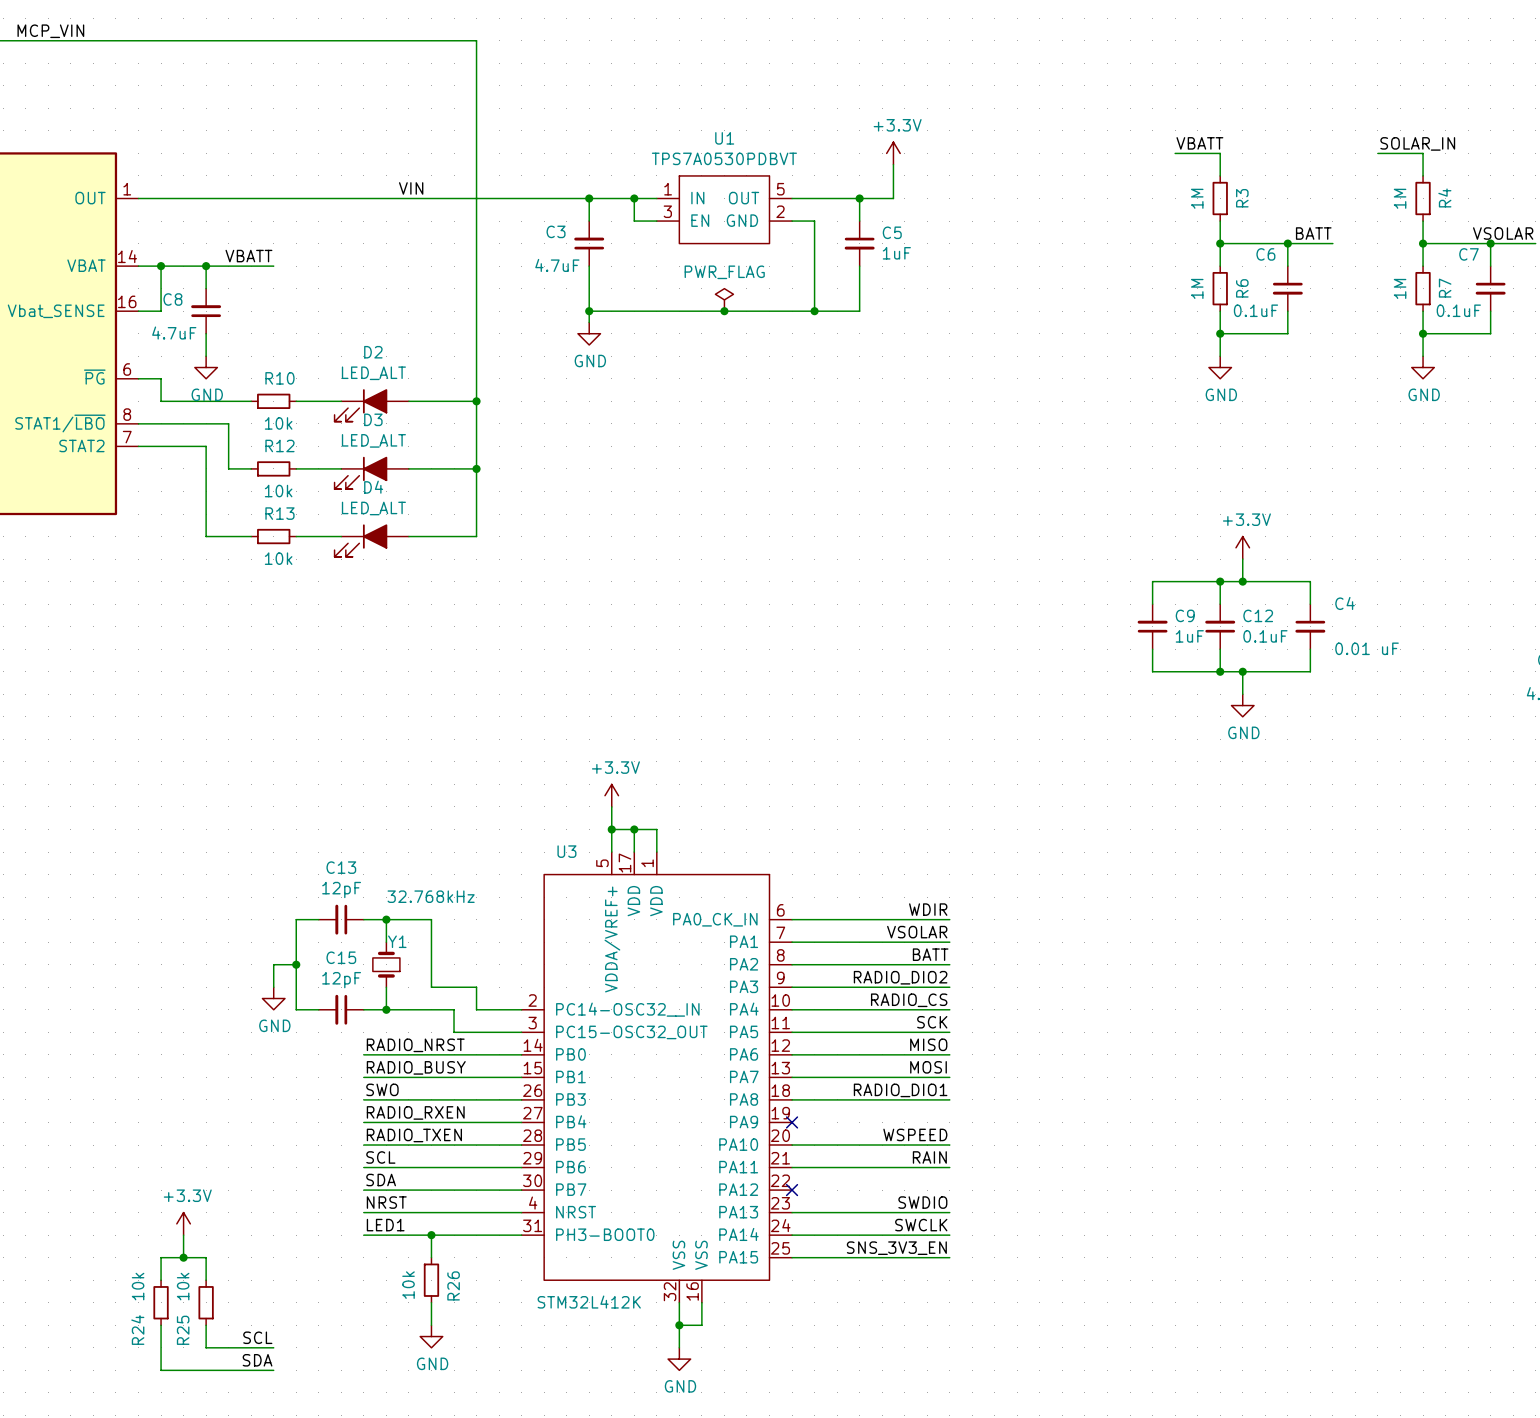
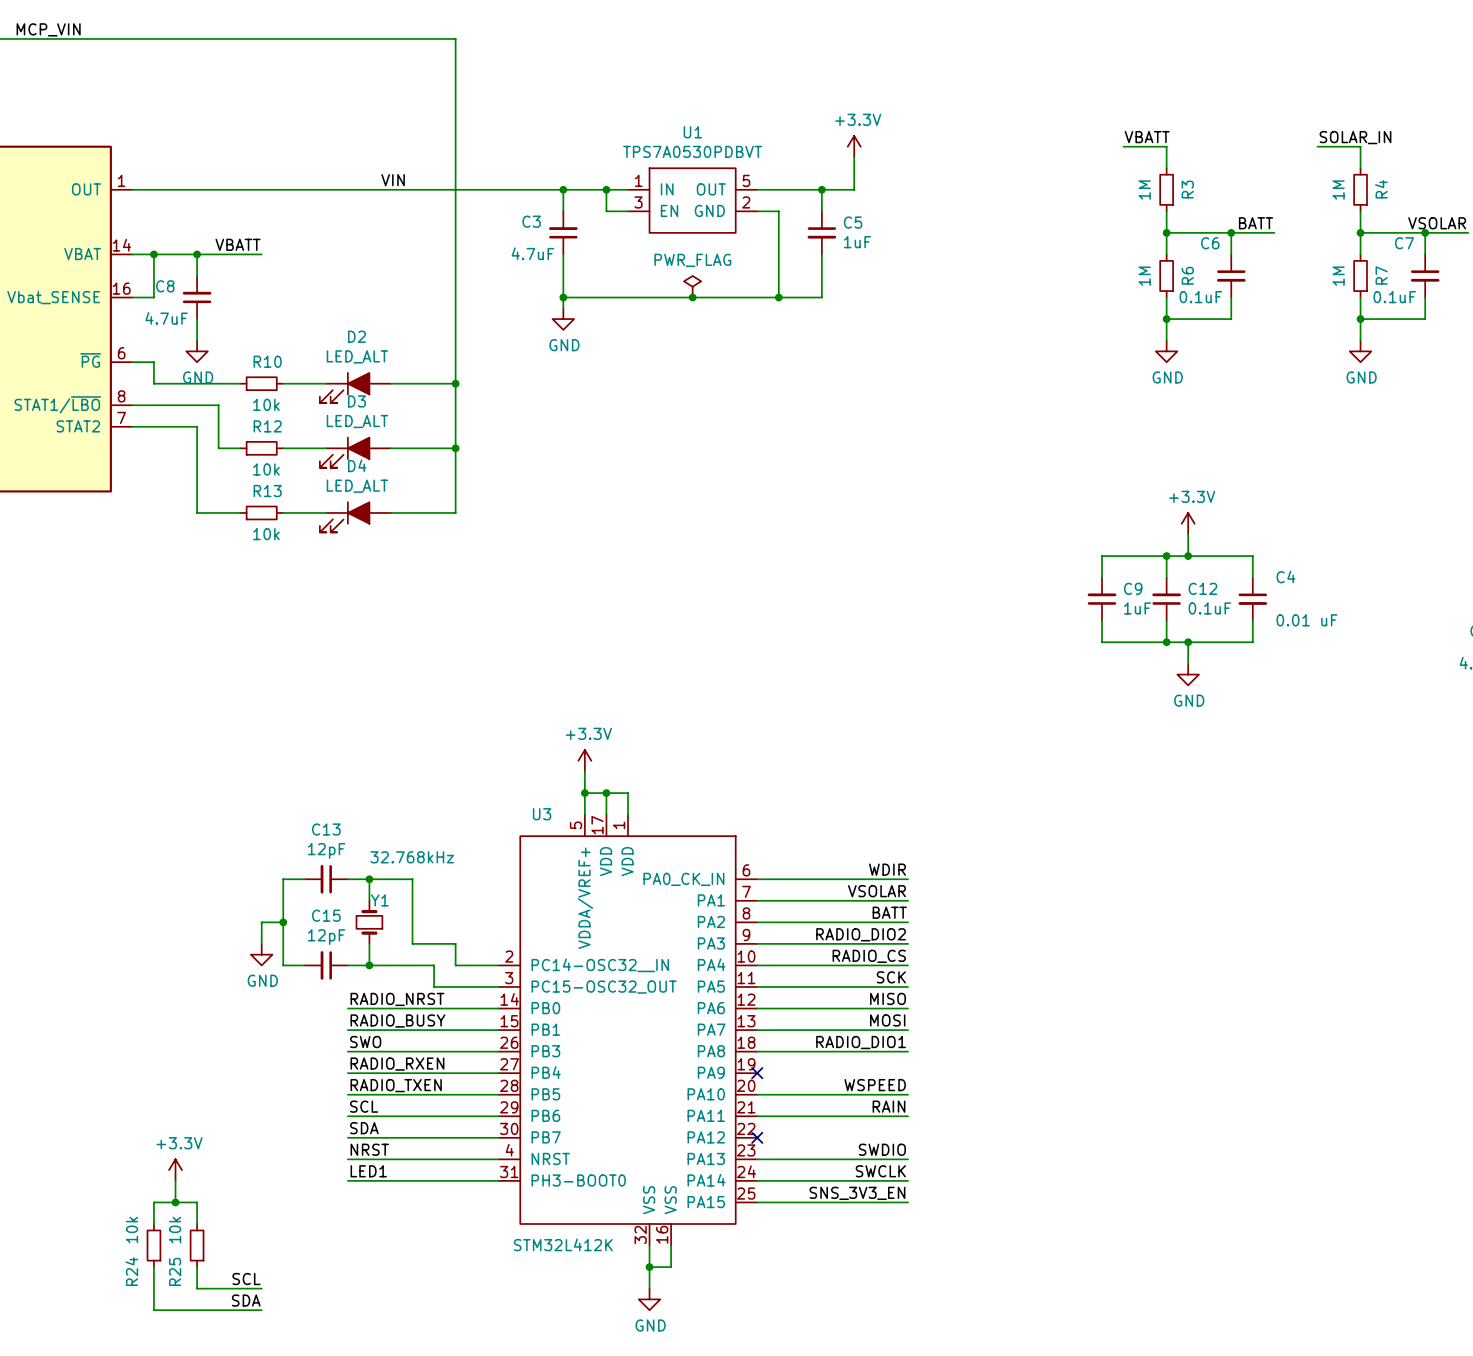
wire: (431, 1235) (431, 1257) -> none
junction: (431, 1235) -> none
R26: 10k (431, 1280) -> none
wire: (431, 1302) (431, 1325) -> none
power symbol: GND (431, 1336) -> none

